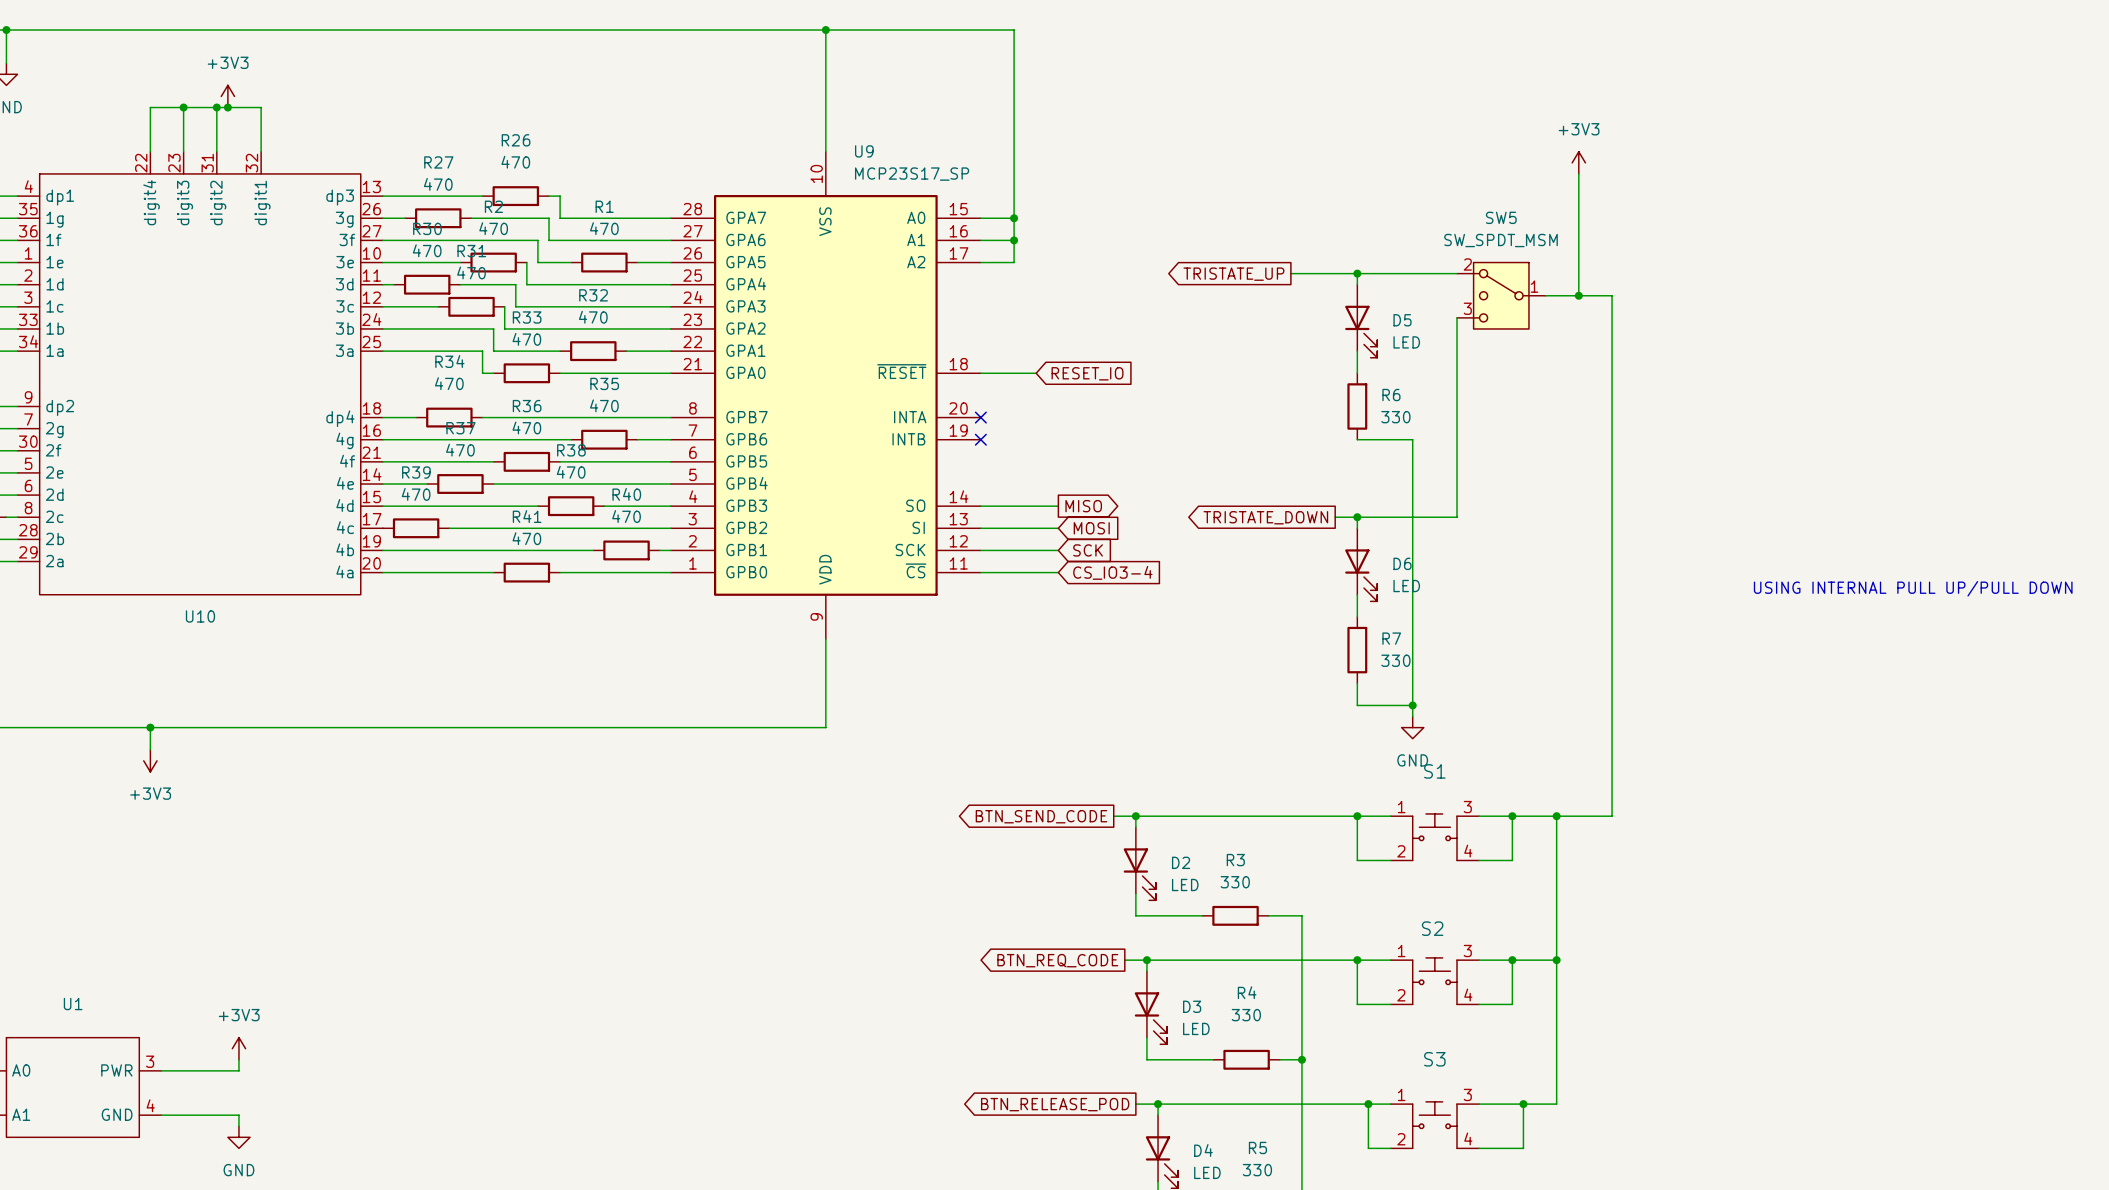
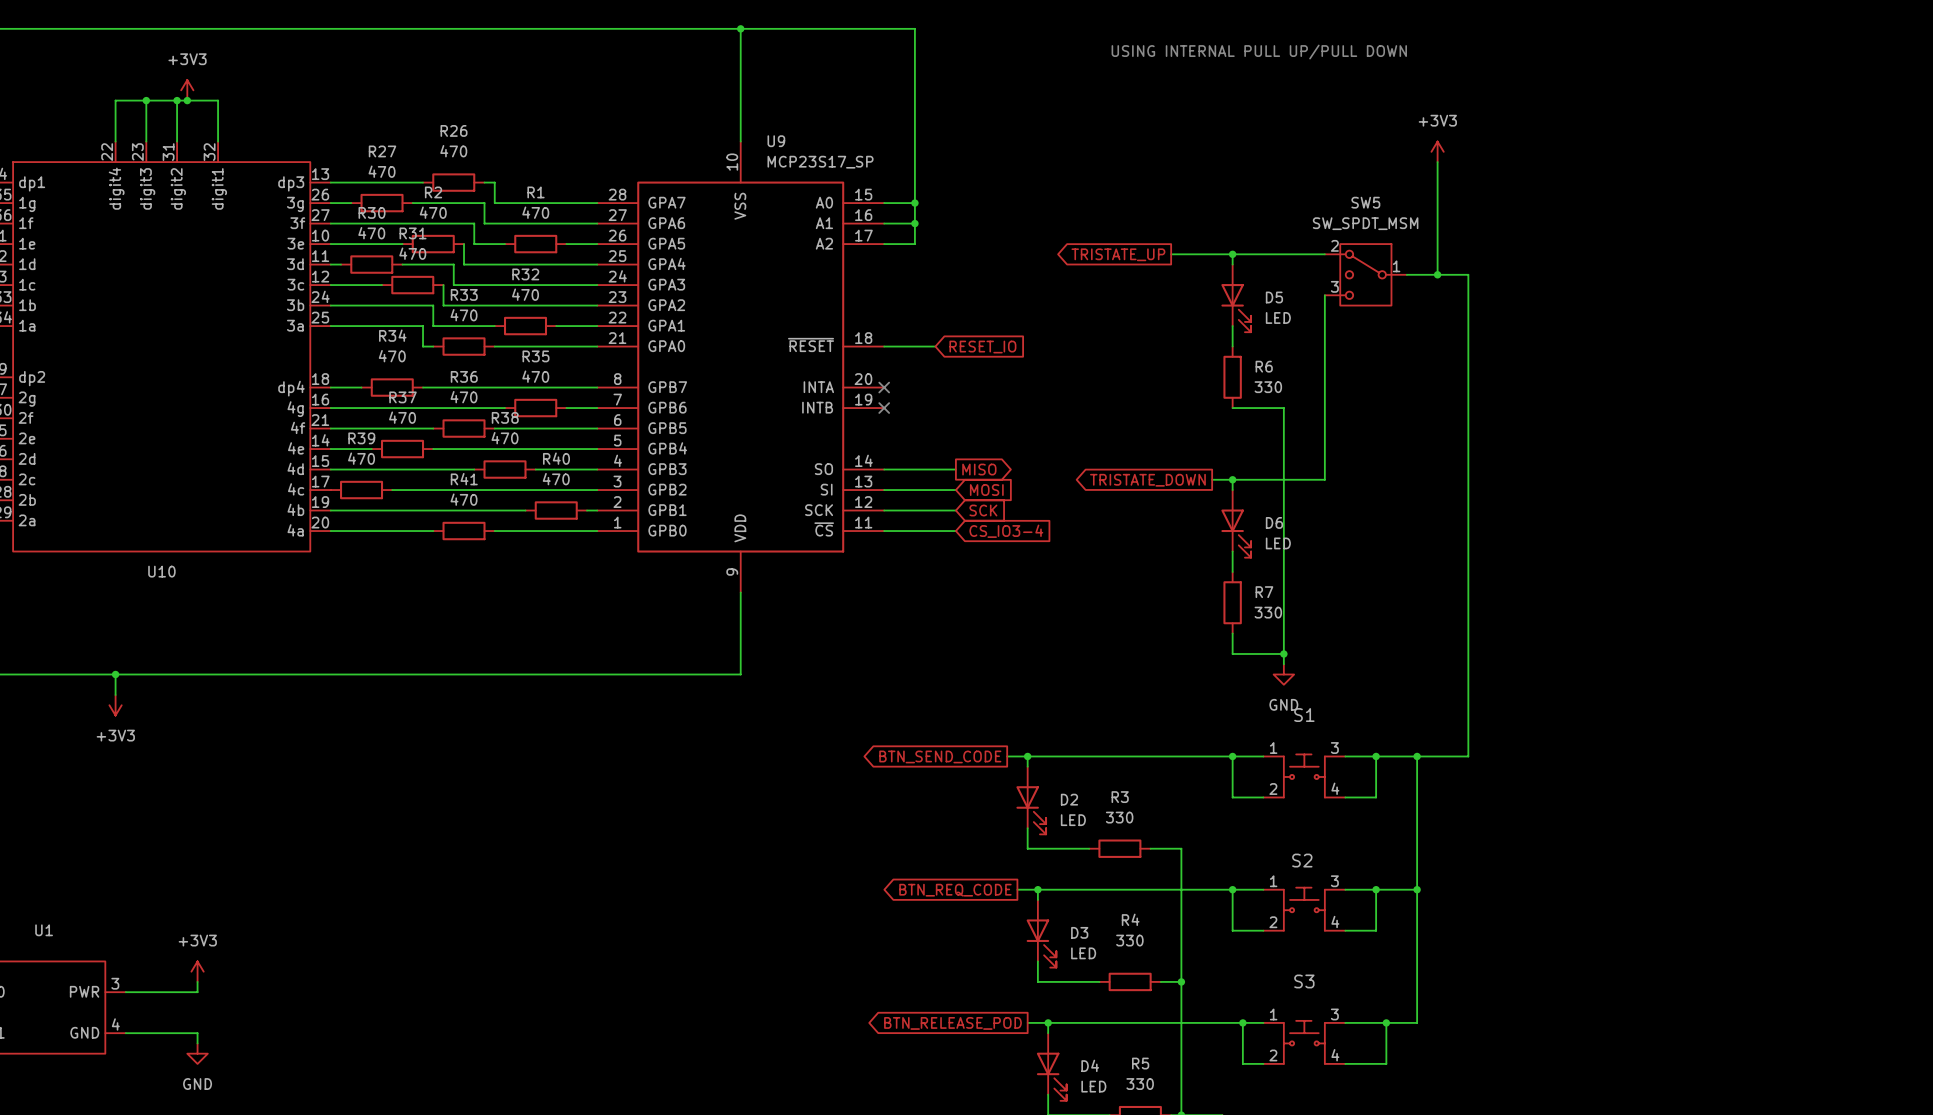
text: none -> USING INTERNAL PULL UP/PULL DOWN (1259, 52)
text: USING INTERNAL PULL UP/PULL DOWN (1913, 588) -> none

